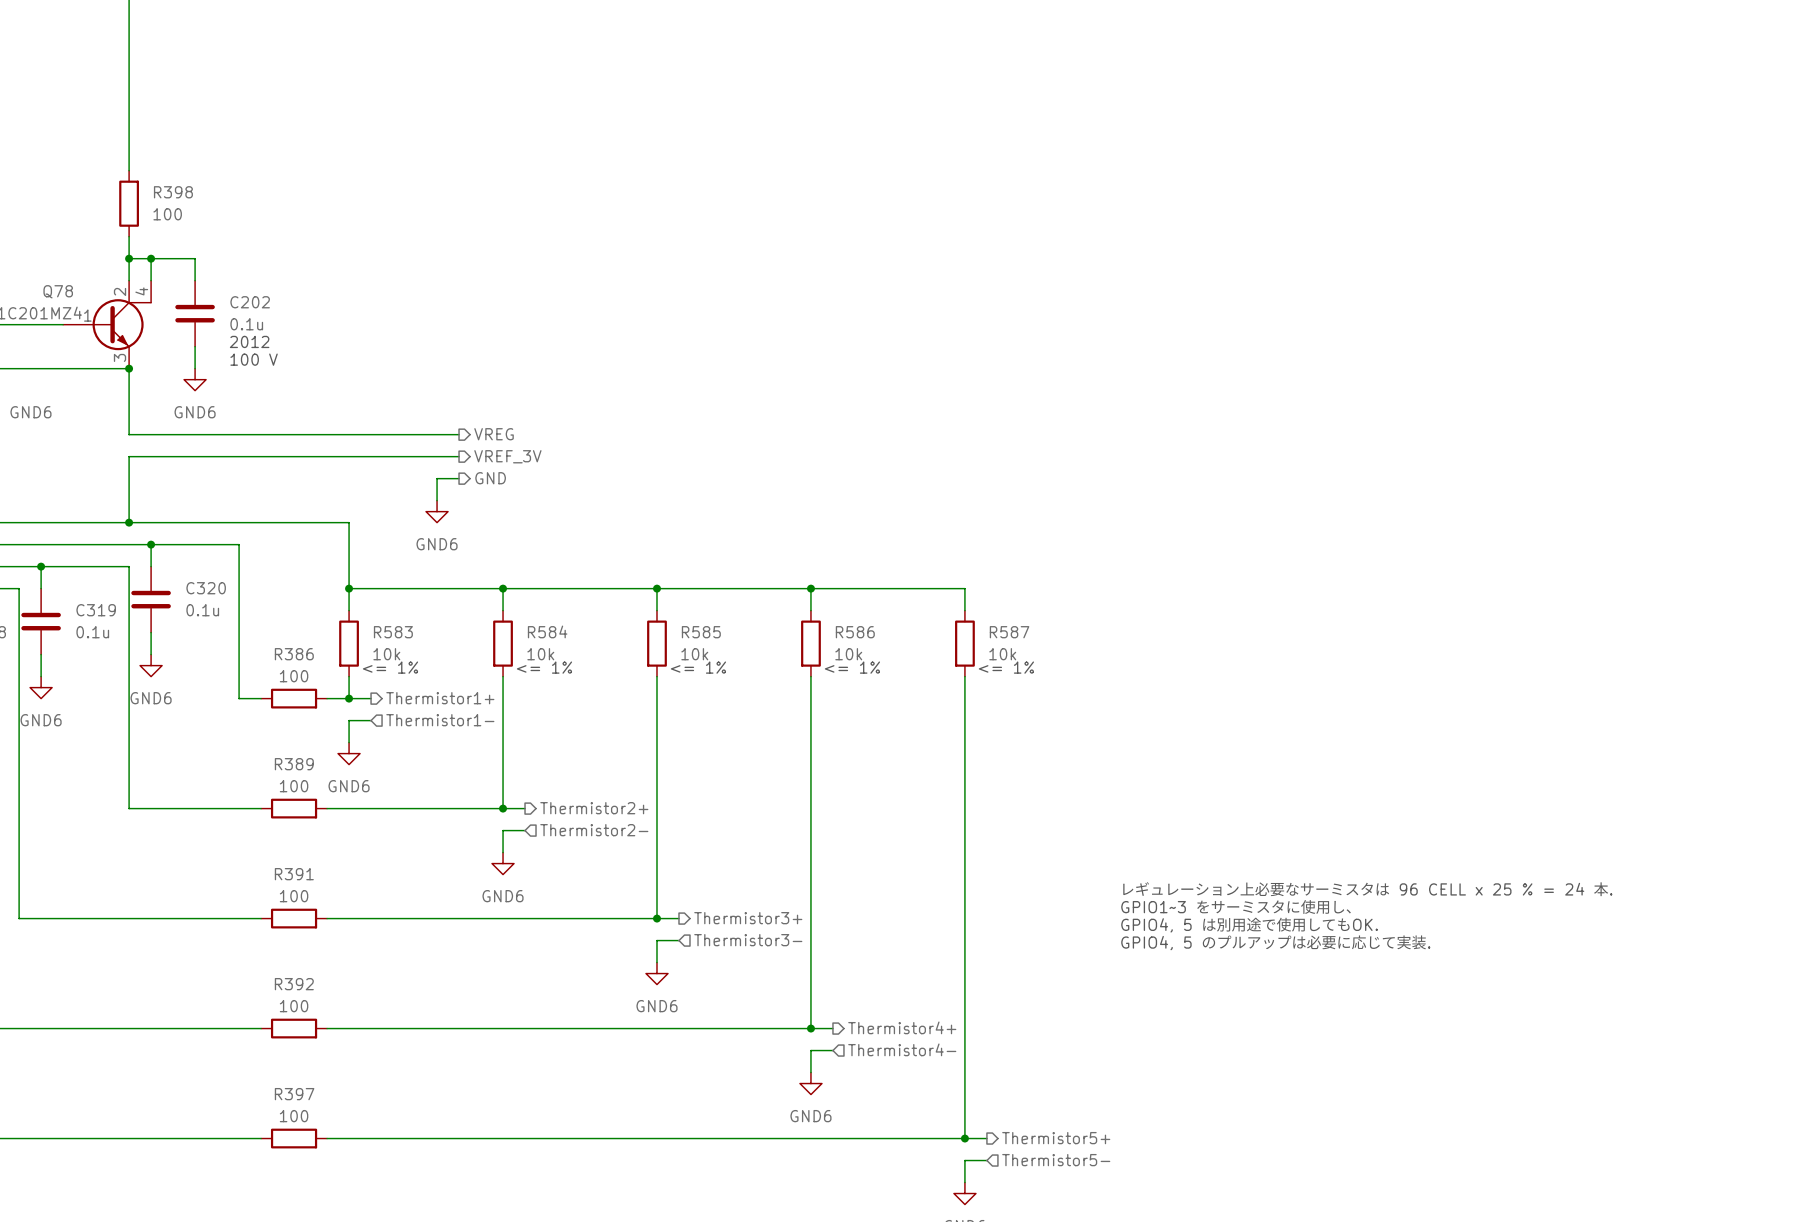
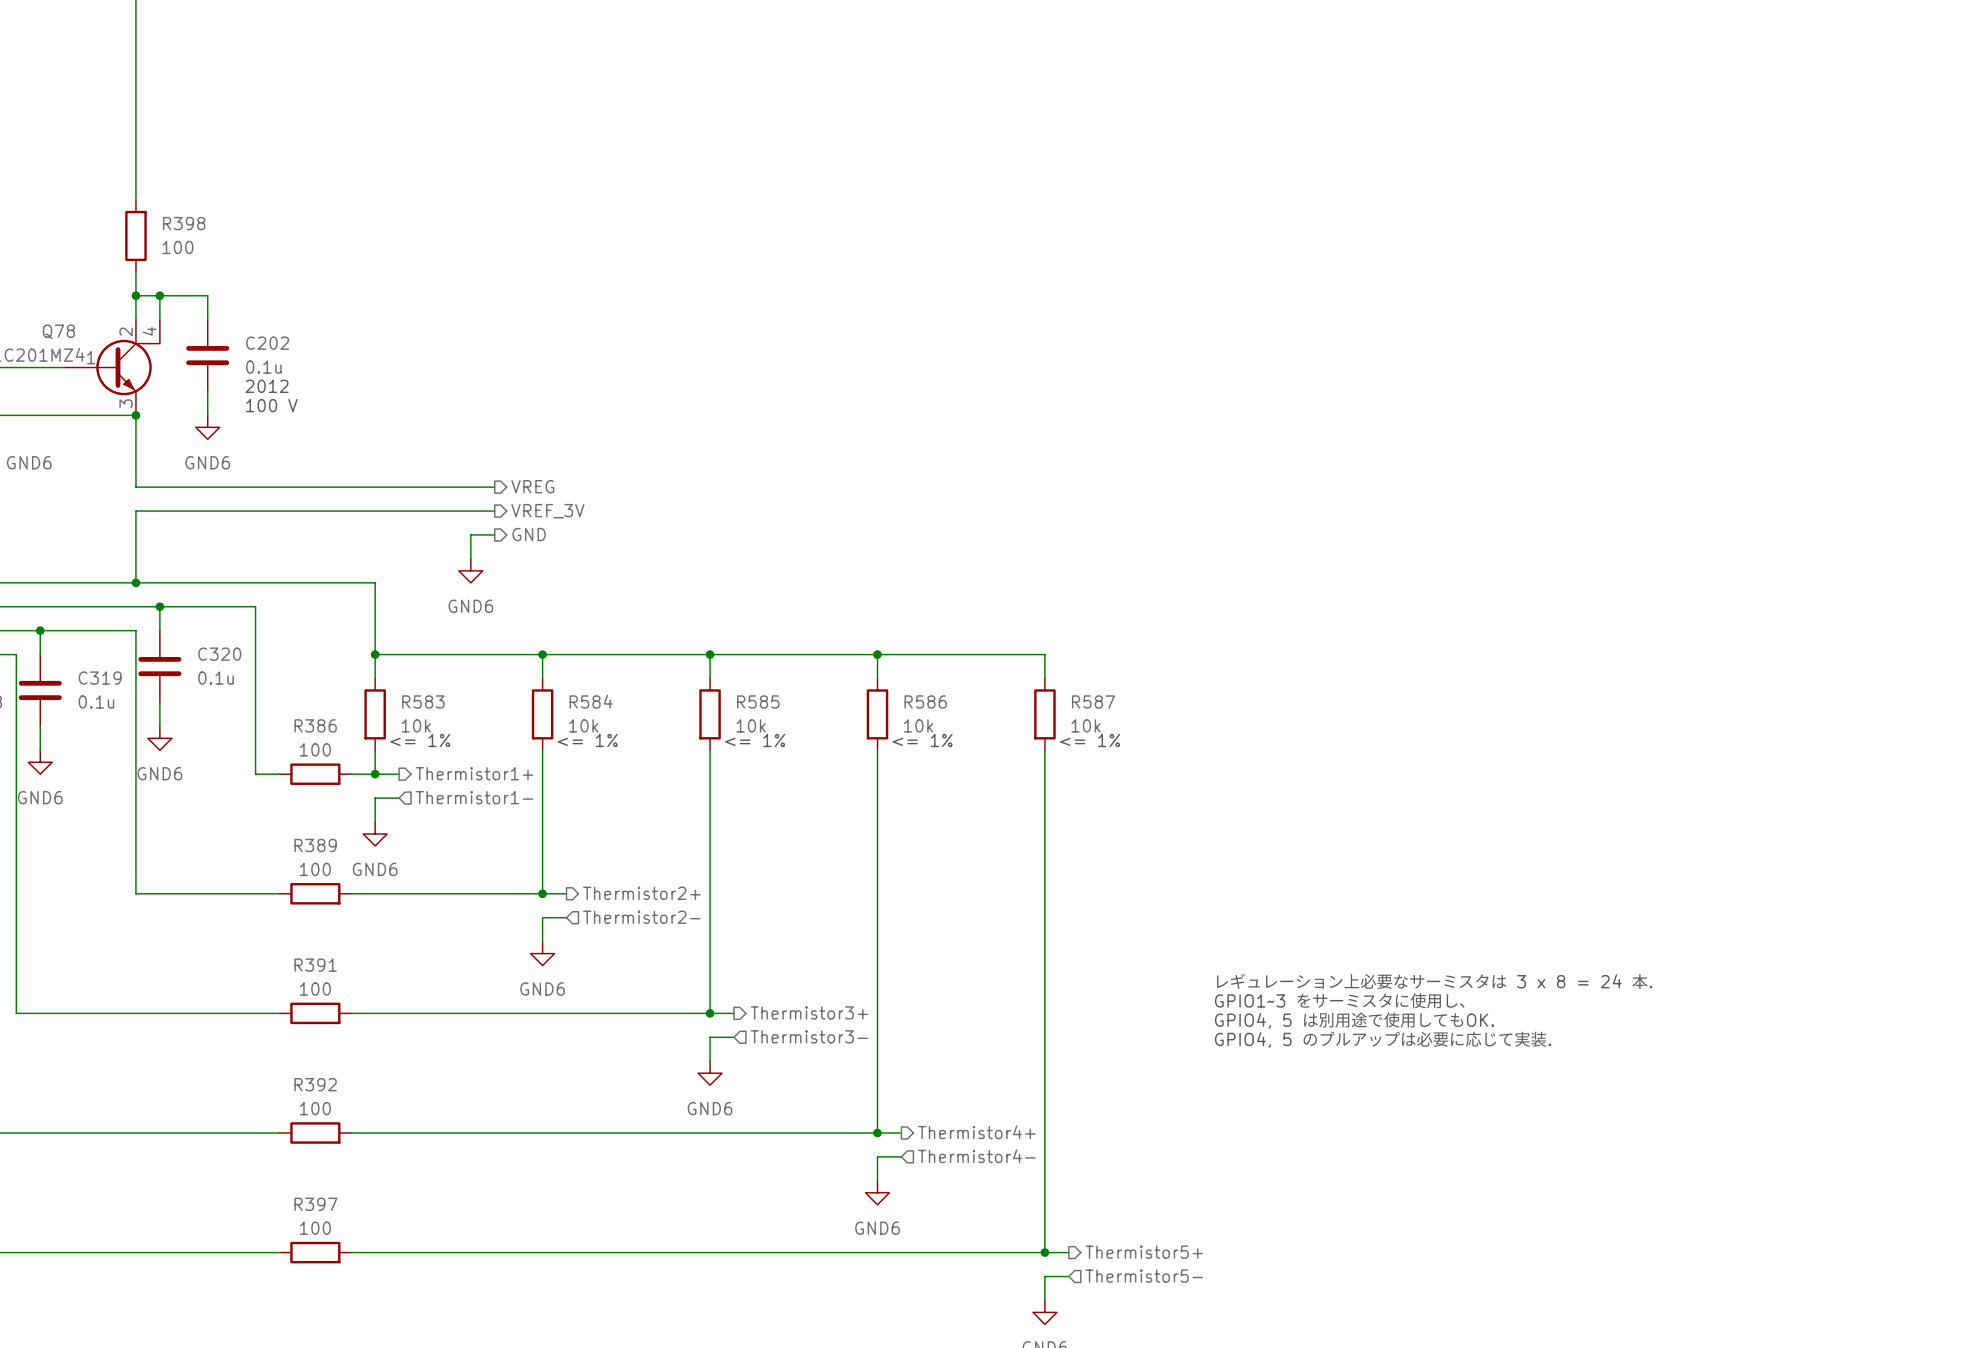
text: レギュレーション上必要なサーミスタは 96 CELL x 25 % = 24 本. (1367, 889) -> レギュレーション上必要なサーミスタは 3 x 8 = 24 本. (1434, 981)

